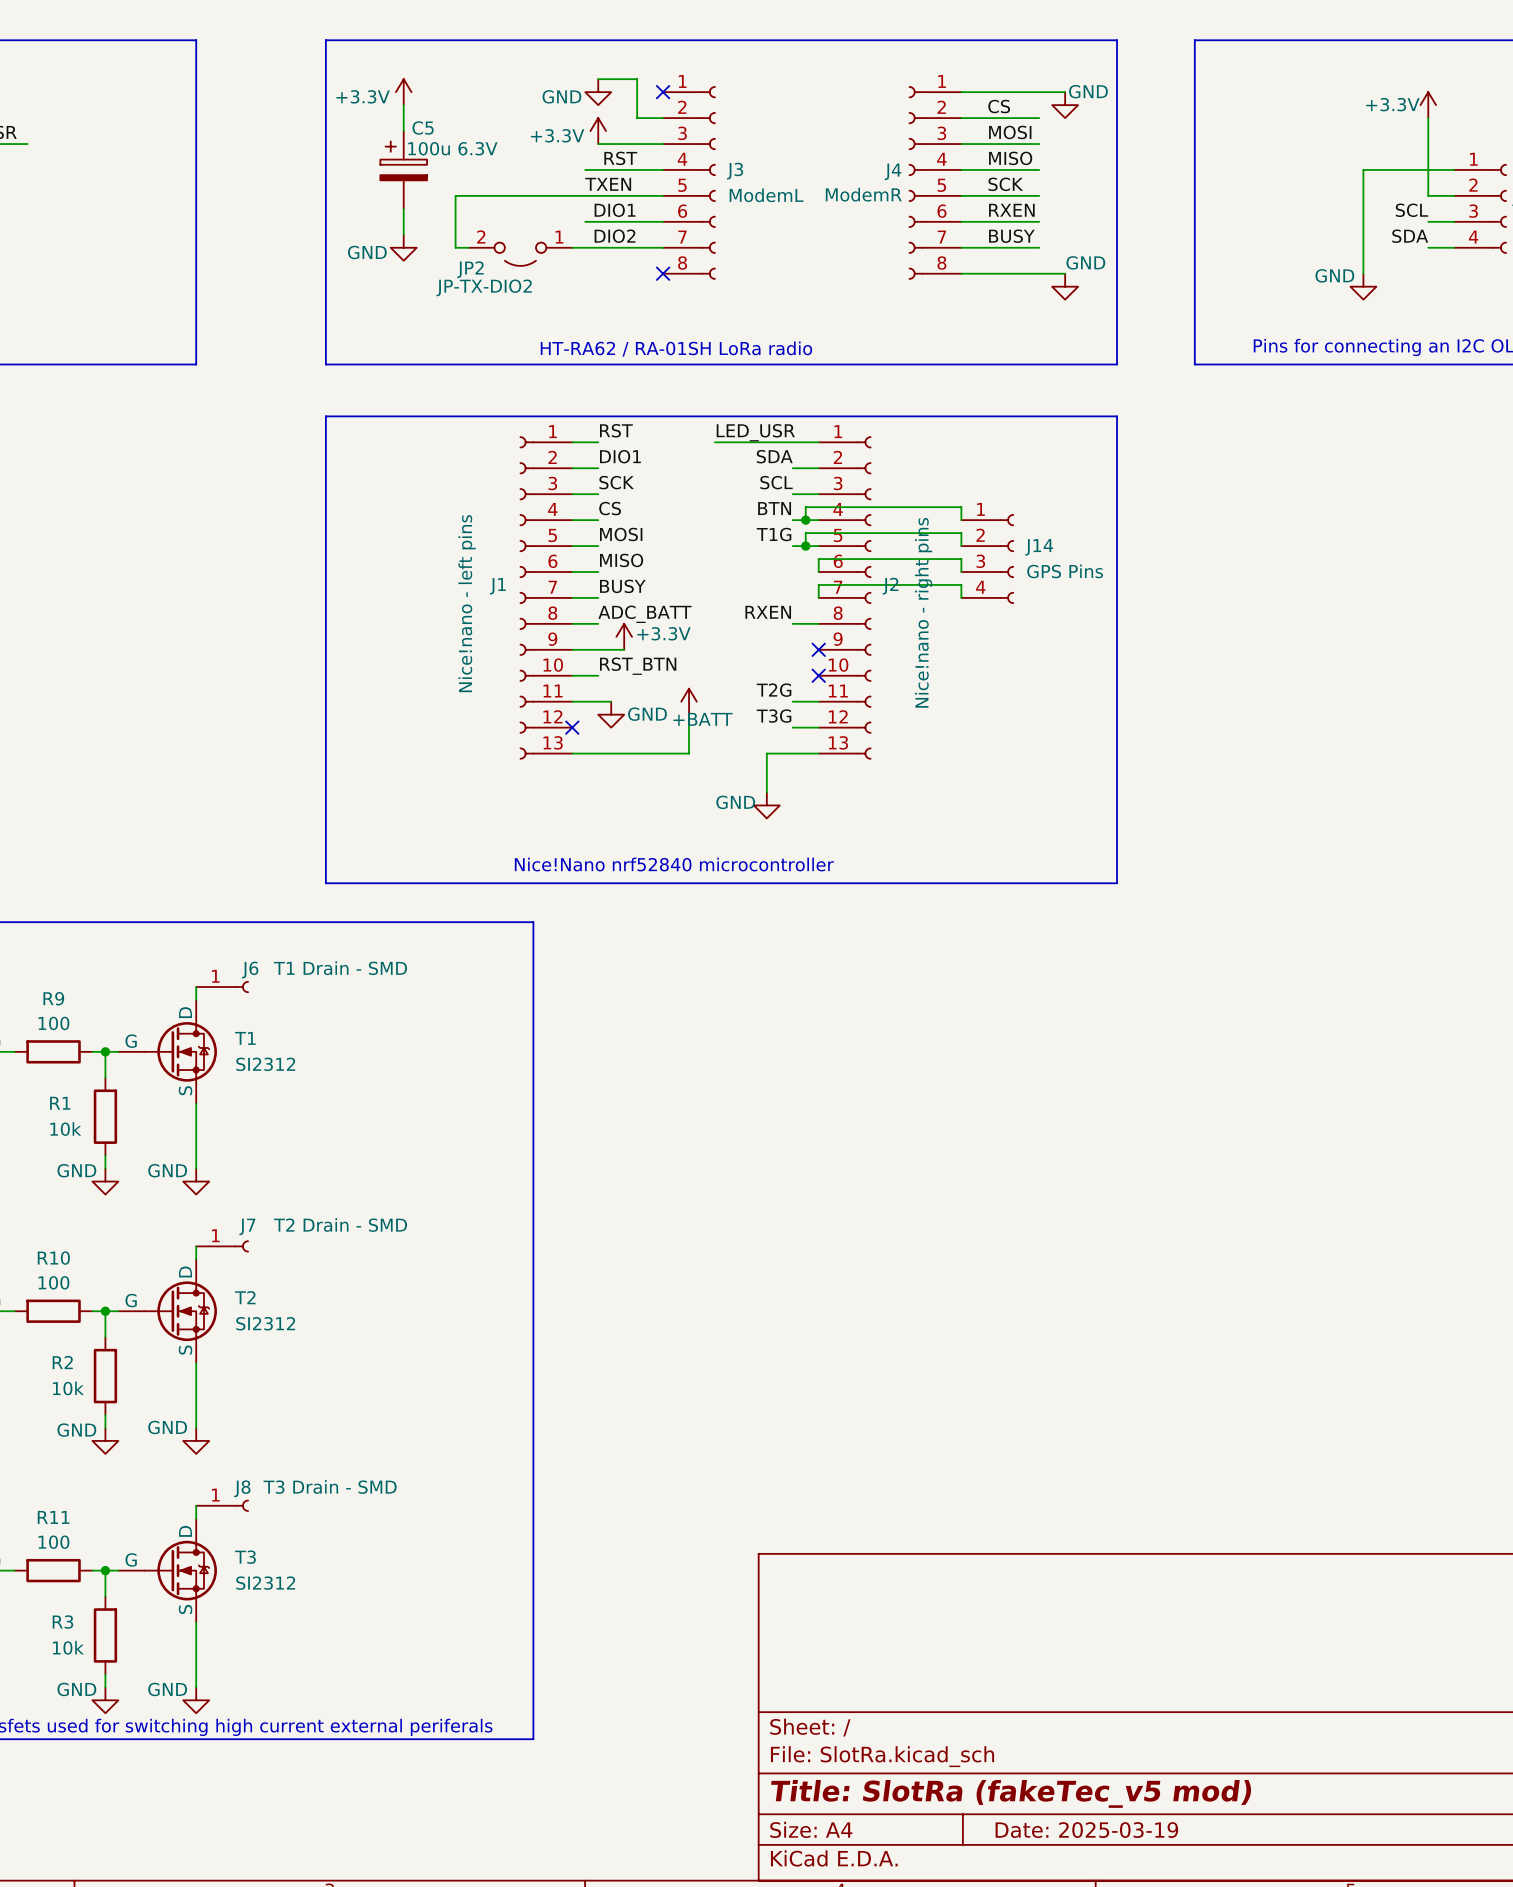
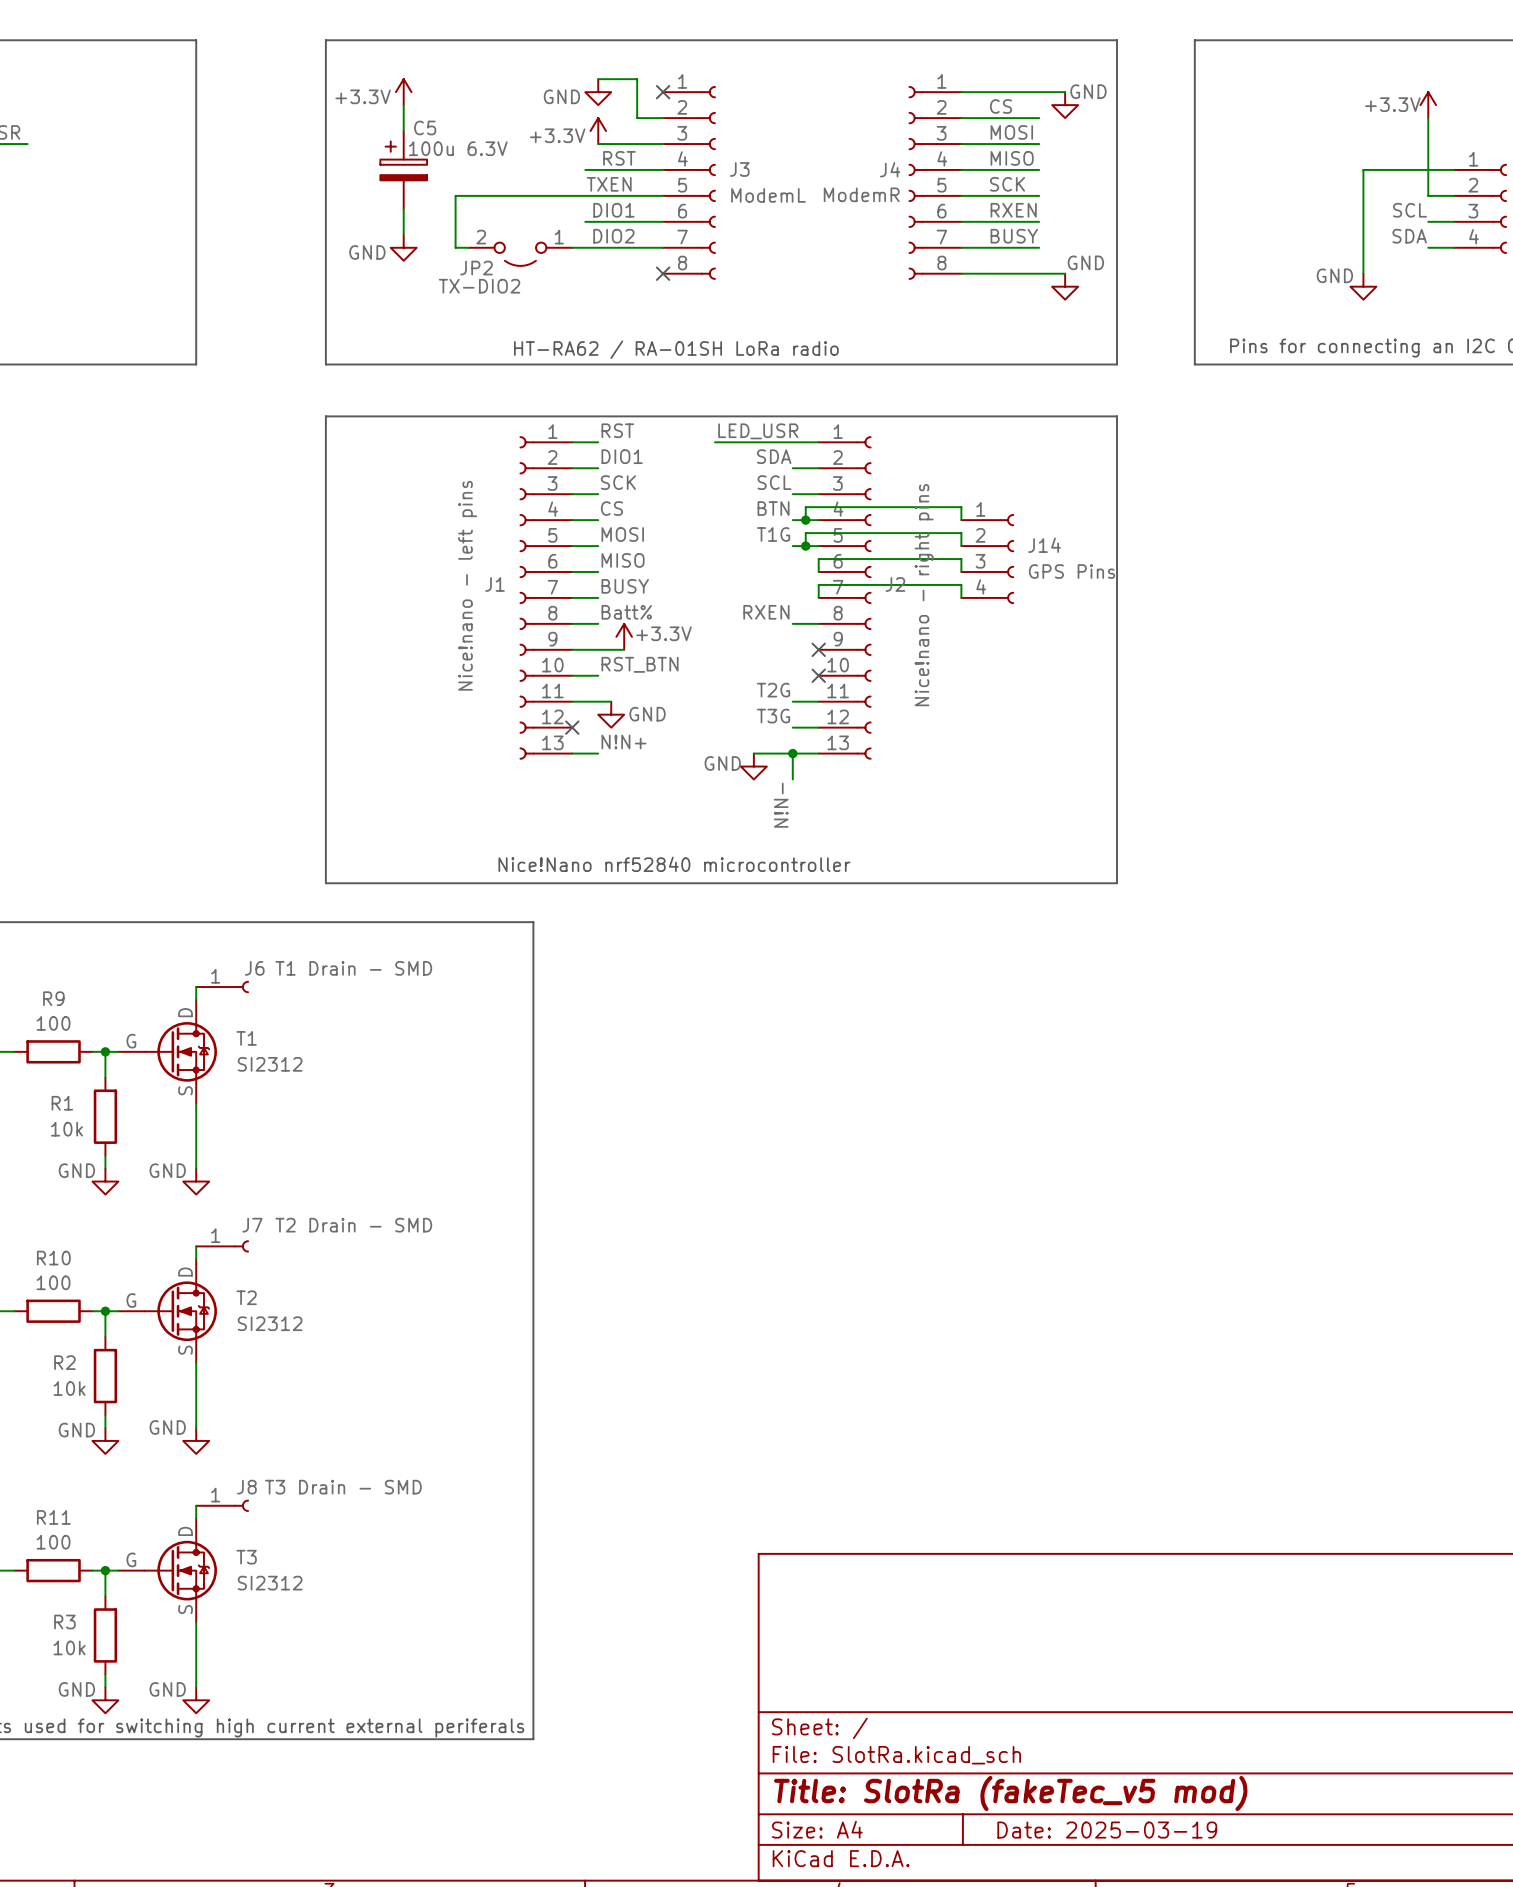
JP2 value: JP-TX-DIO2 (484, 287) -> TX-DIO2 (479, 286)
label: ADC_BATT (644, 614) -> Batt% (626, 612)
power symbol: +BATT (689, 701) -> none
wire: (689, 714) (689, 753) (598, 753) -> none
label: none -> N!N+ (623, 742)
wire: (766, 753) (766, 792) -> (766, 753) (753, 753)
wire: none -> (792, 753) (792, 779)
junction: none -> (792, 753)
label: none -> N!N- (781, 805)
power symbol position: GND (766, 805) -> GND (753, 766)

